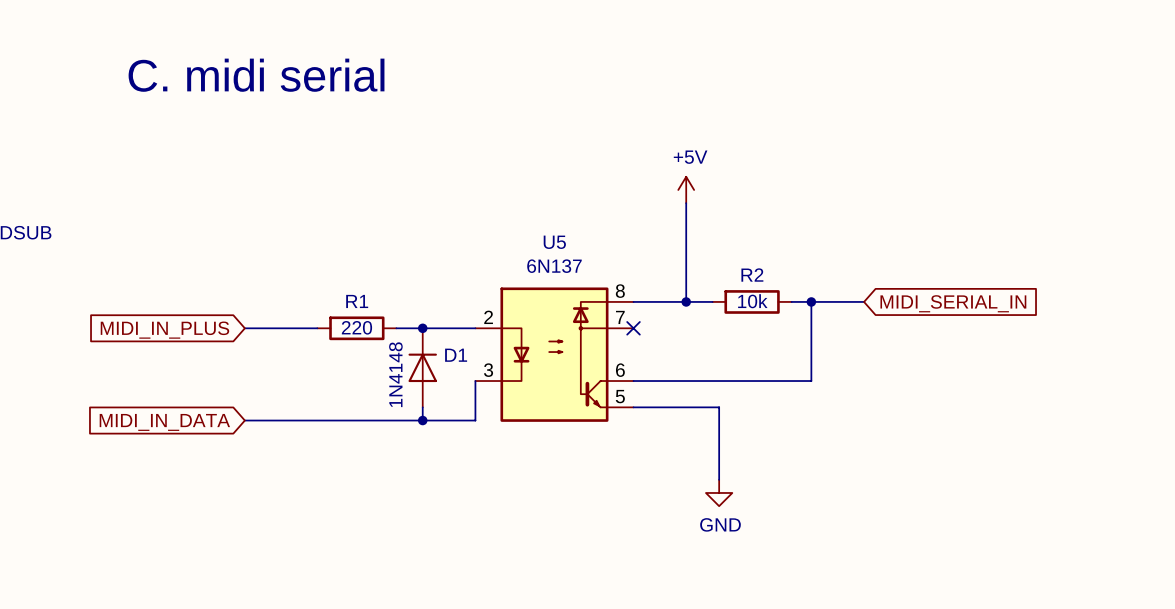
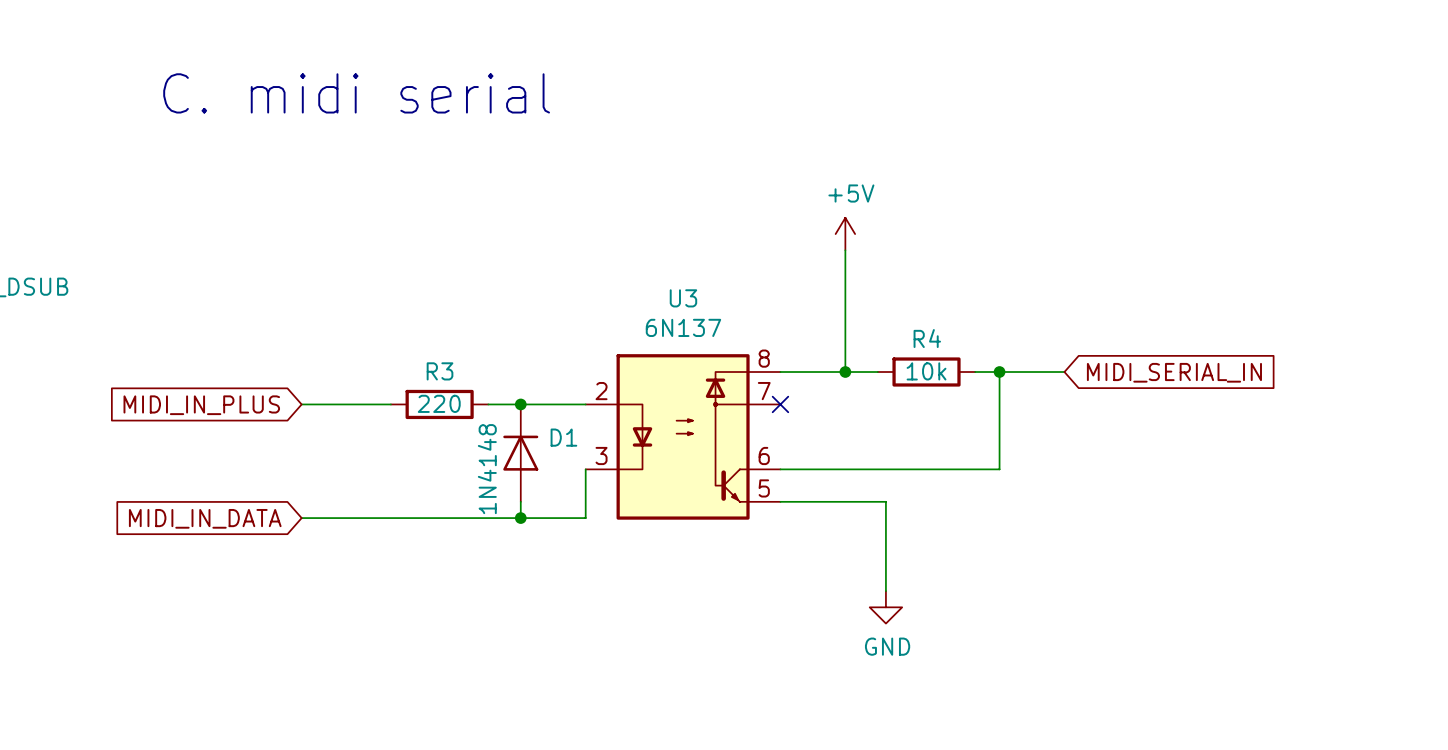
U5 name: U5 (554, 242) -> U3 (683, 298)
R2 name: R2 (752, 275) -> R4 (927, 338)
R1 name: R1 (357, 301) -> R3 (440, 371)

